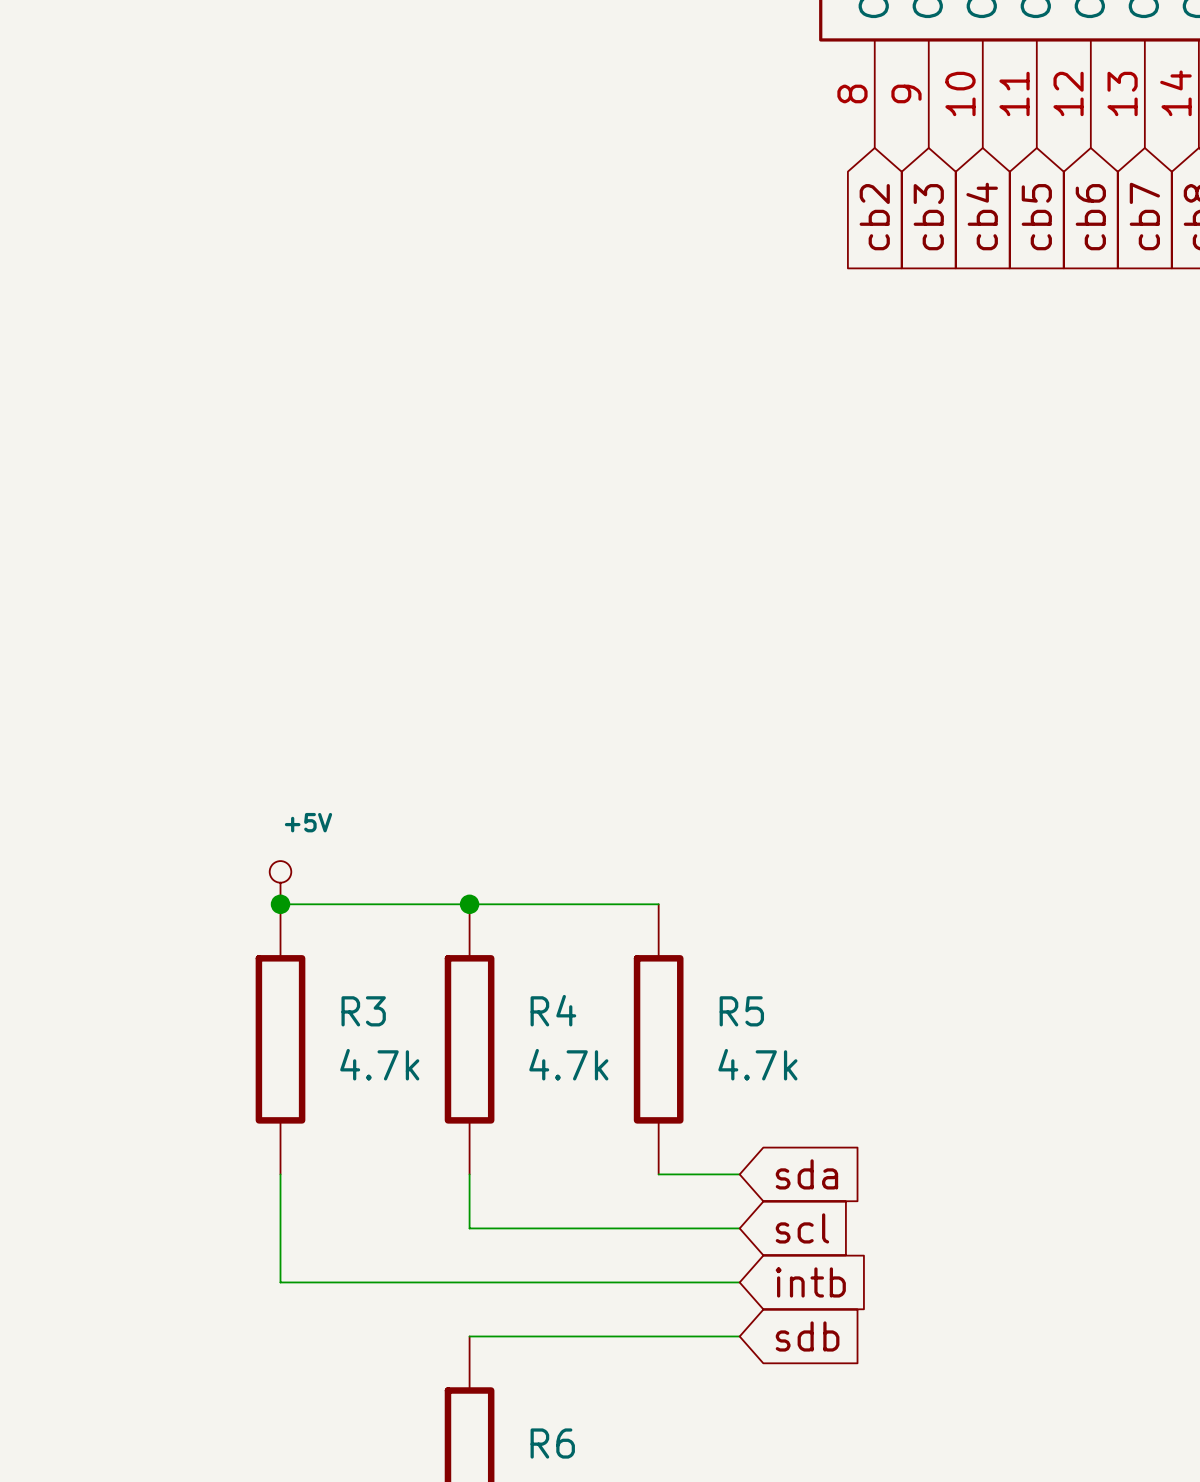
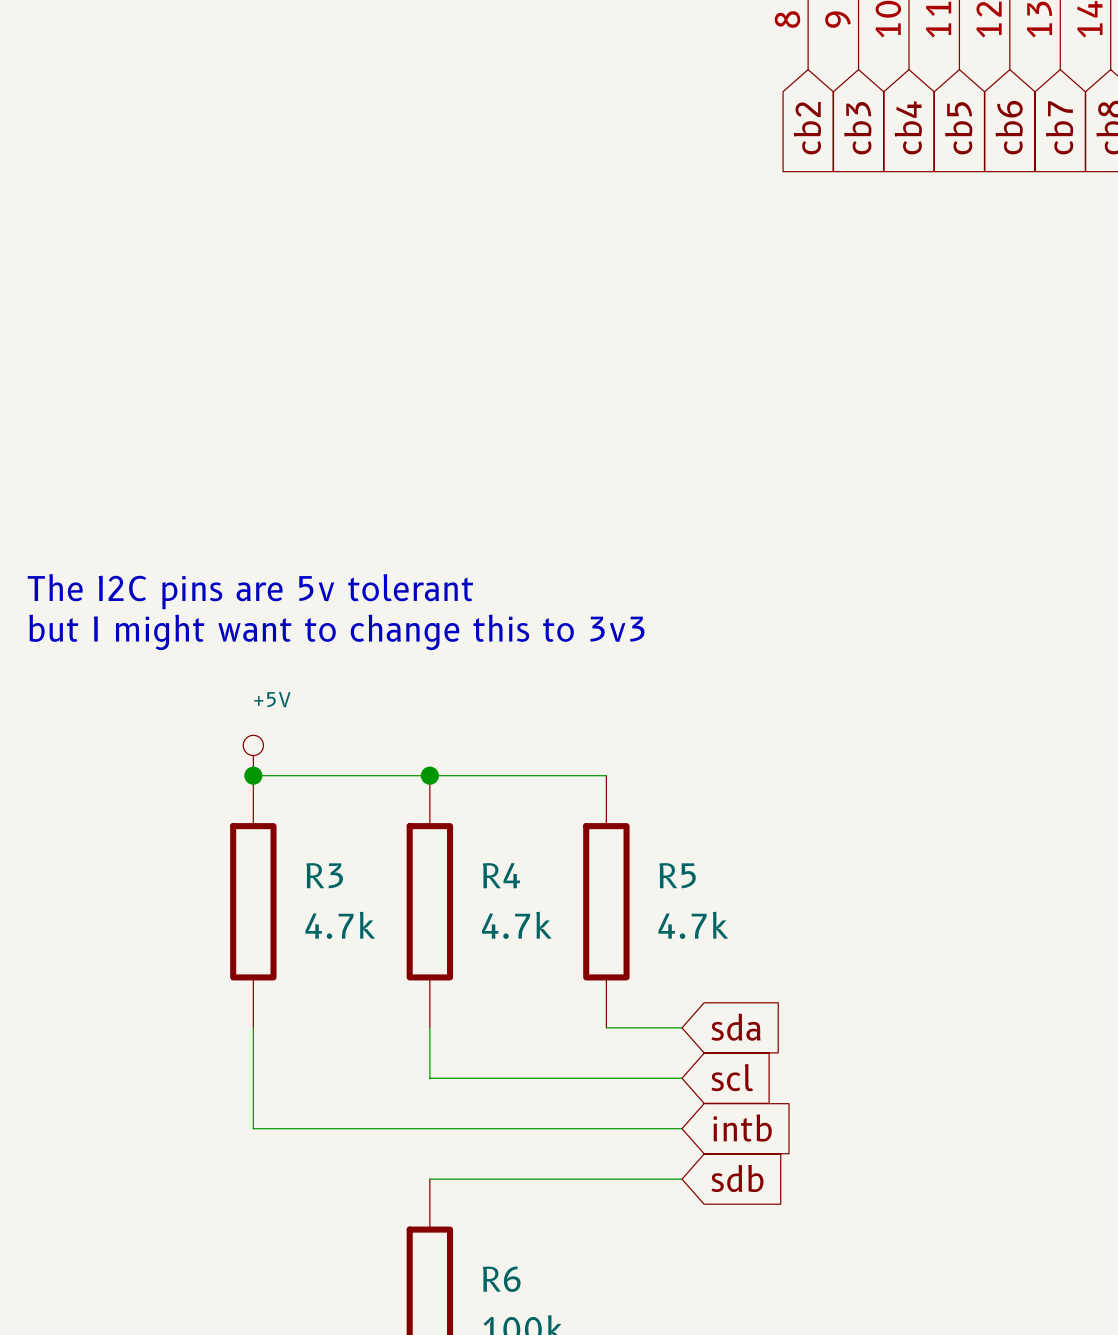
text: none -> The I2C pins are 5v tolerant (250, 591)
text: none -> but I might want to change this to 3v3 (336, 632)

